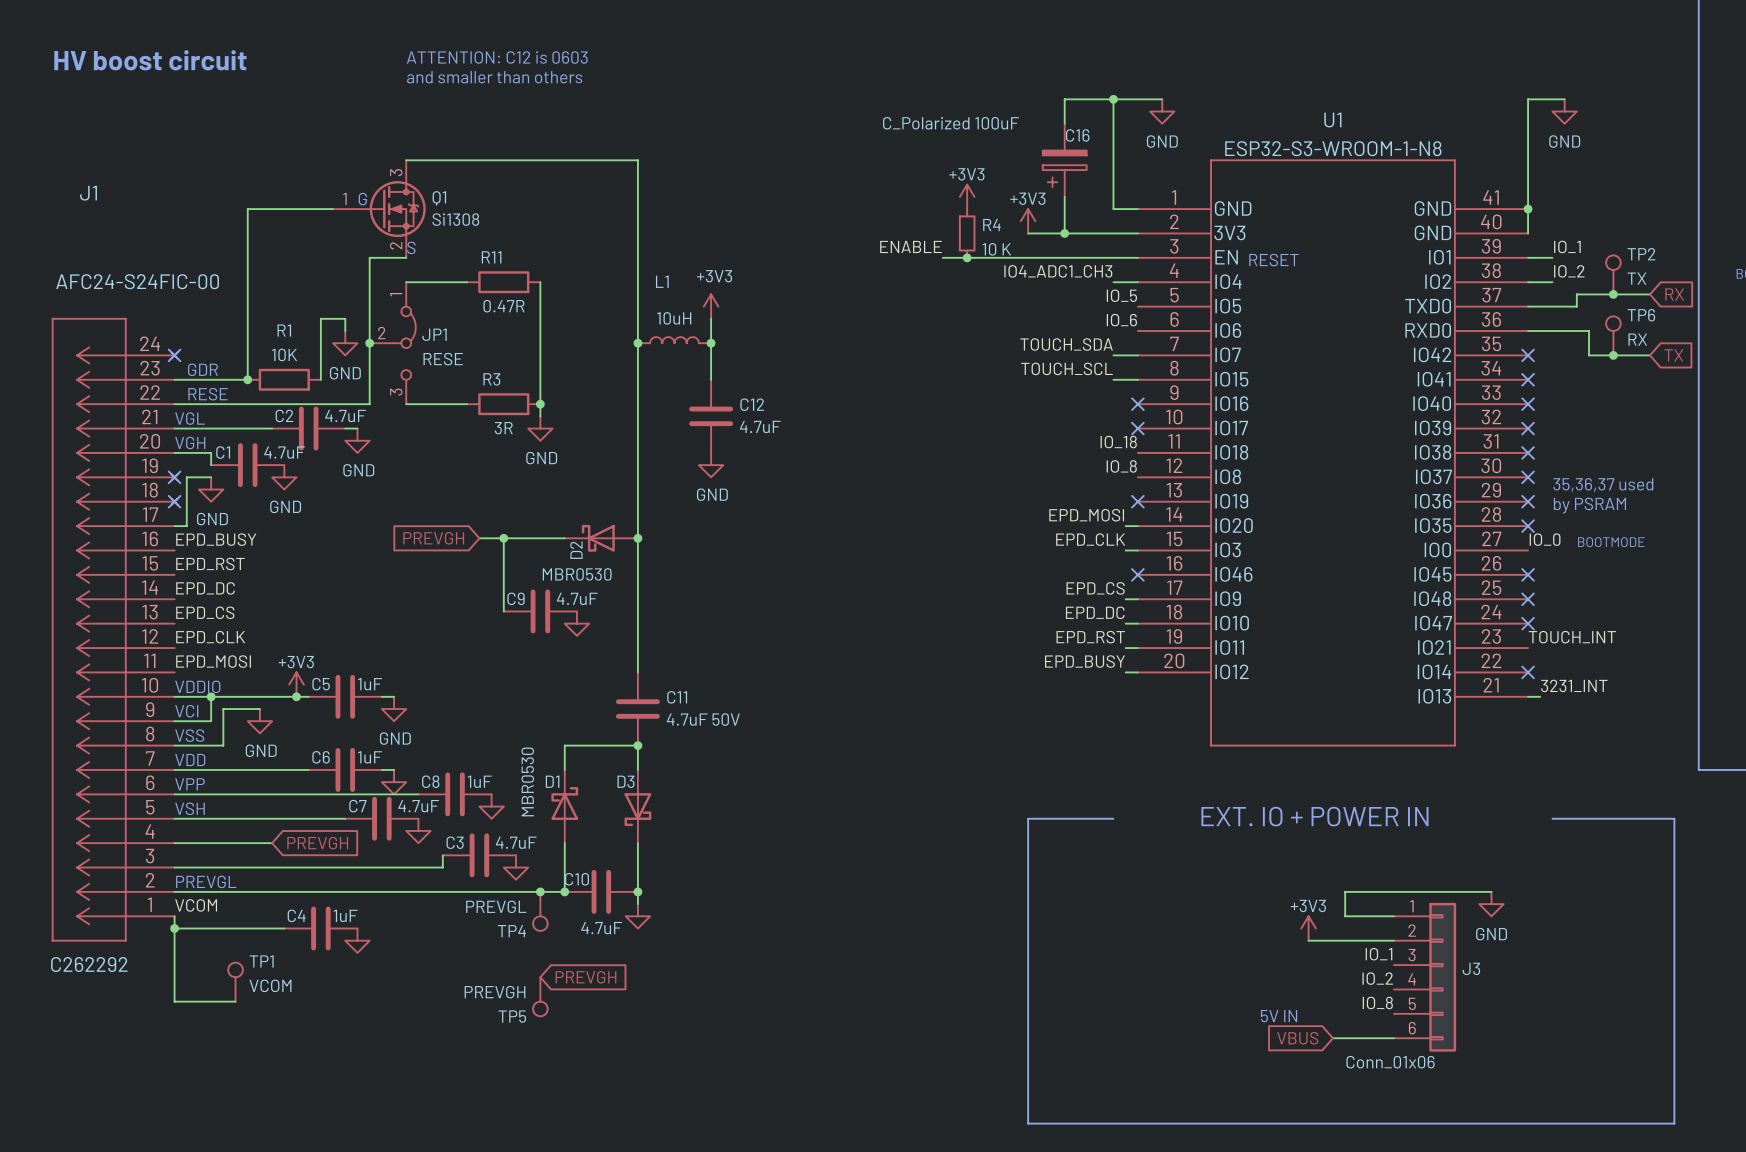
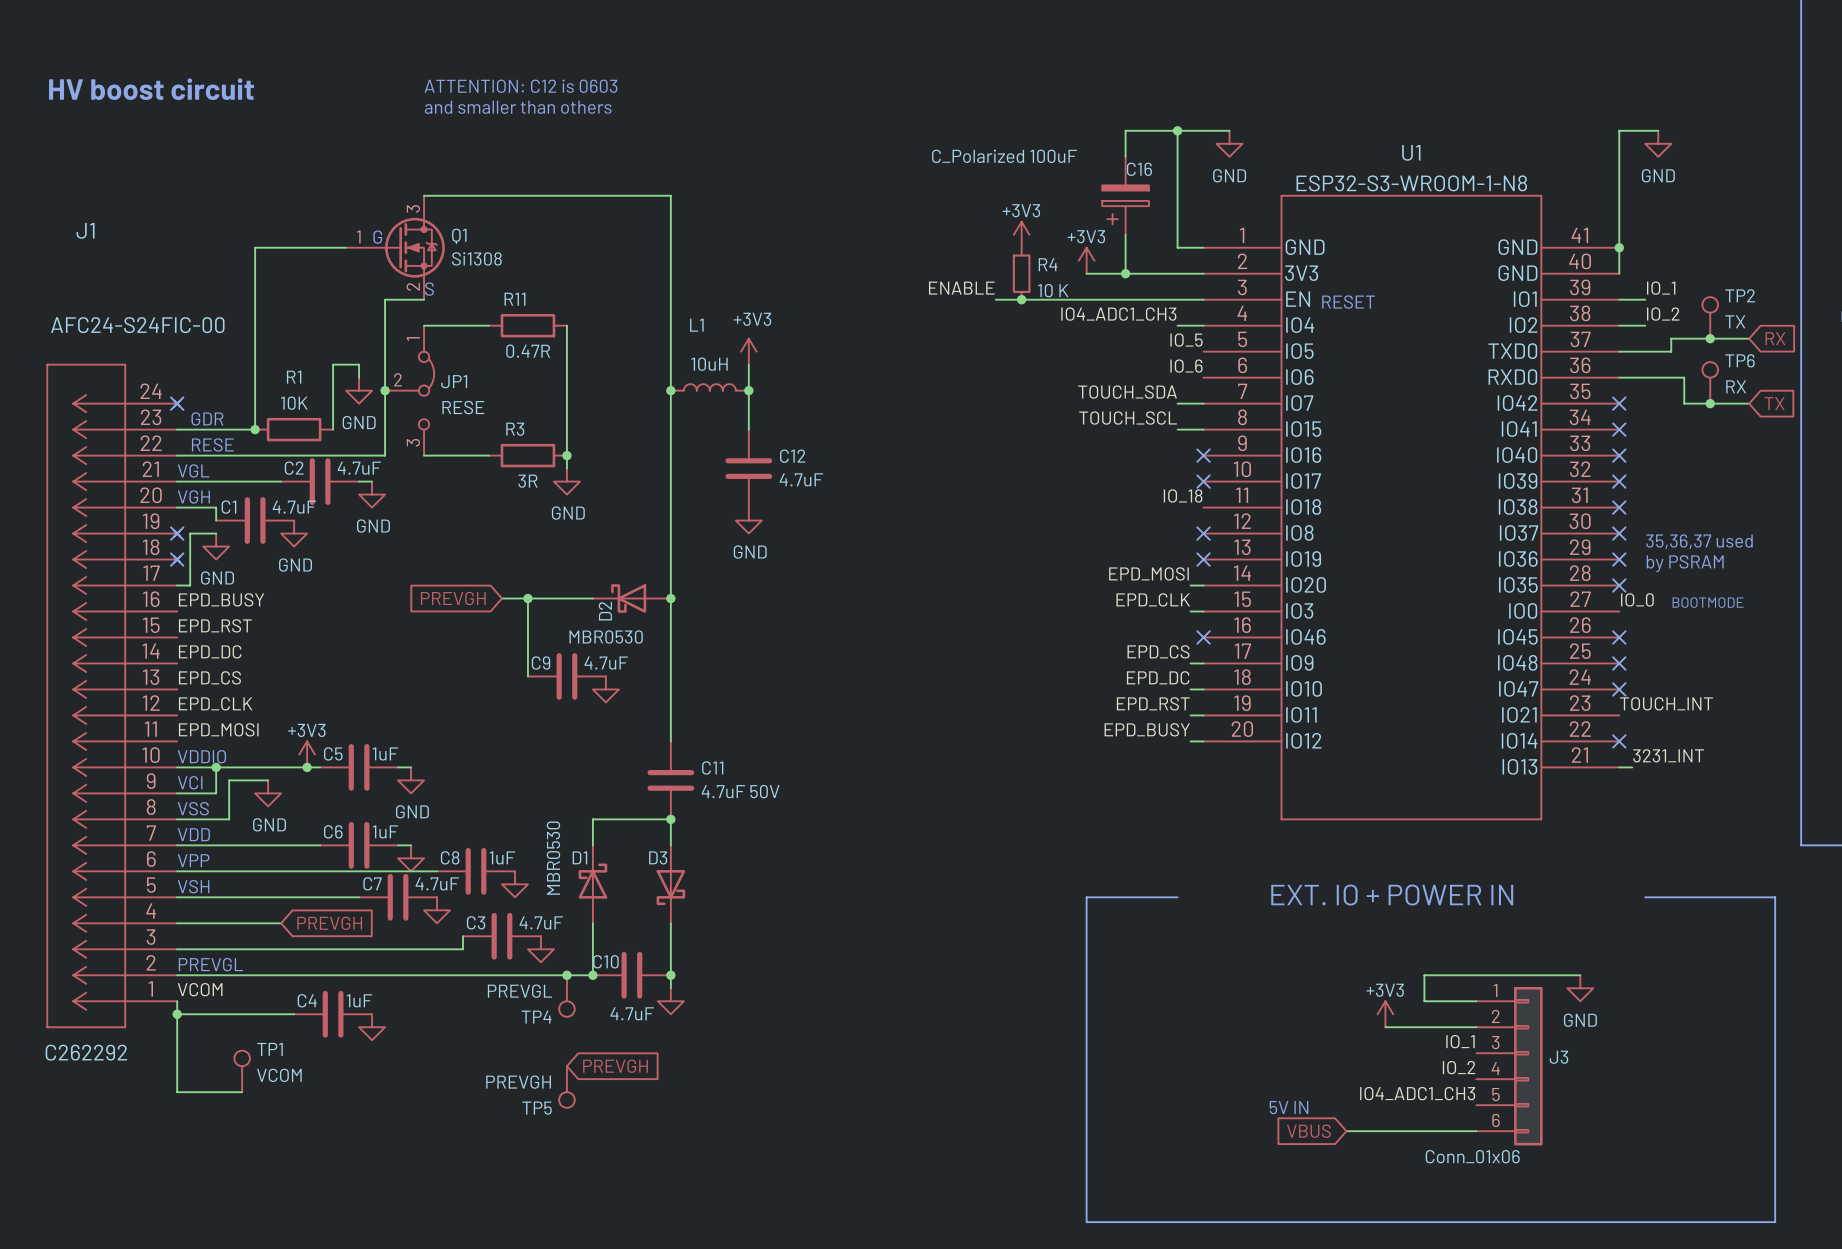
label: IO_8 (1121, 466) -> none
no-connect mark: none -> (1203, 533)
label: IO_8 (1377, 1002) -> IO4_ADC1_CH3 (1417, 1093)
text position: 5V IN (1279, 1016) -> 5V IN (1289, 1107)
wire: none -> (1346, 1131) (1411, 1131)
global label position: VBUS (1297, 1038) -> VBUS (1308, 1131)

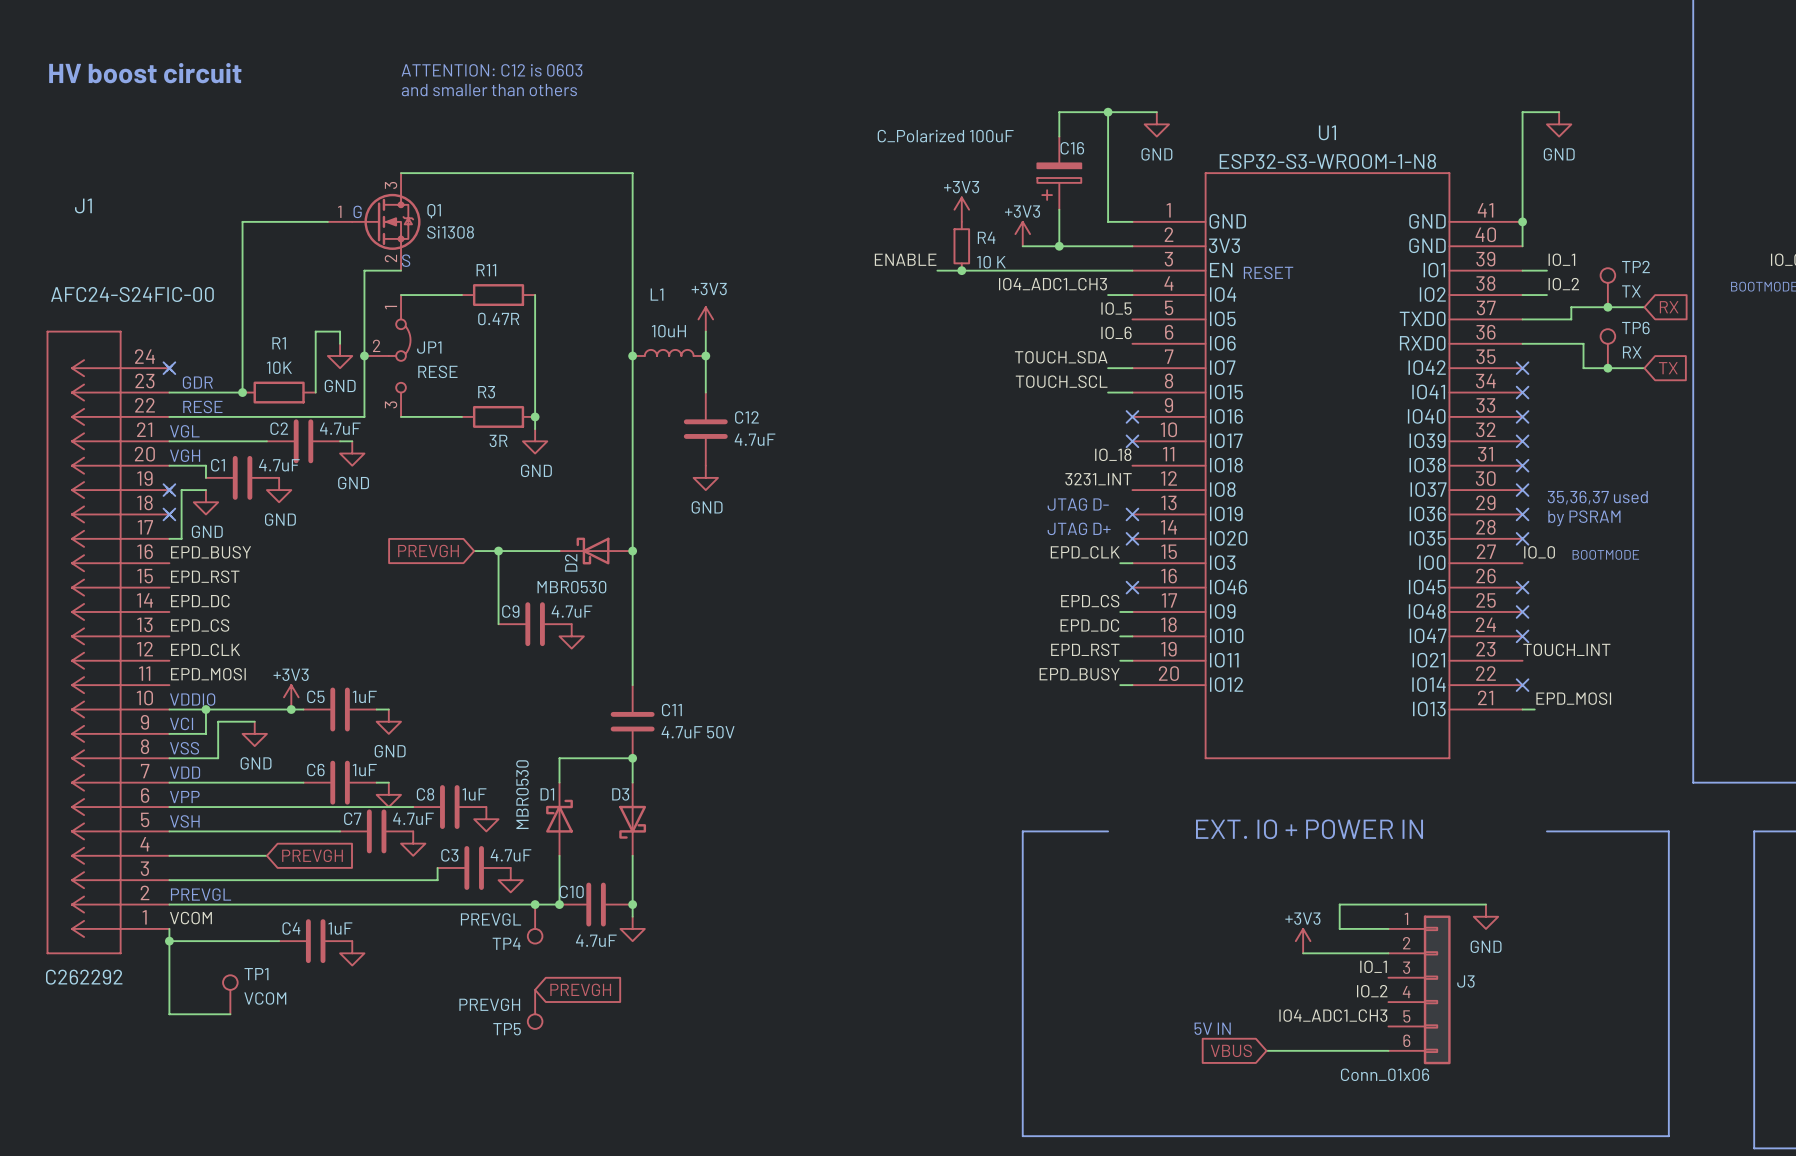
label: none -> 3231_INT (1098, 479)
no-connect mark position: (1203, 533) -> (1132, 538)
text: none -> JTAG D- (1078, 504)
label: EPD_MOSI (1148, 573) -> none
text: none -> JTAG D+ (1079, 528)
wire: (1190, 585) (1203, 585) -> none
label: 3231_INT (1668, 755) -> EPD_MOSI (1573, 698)

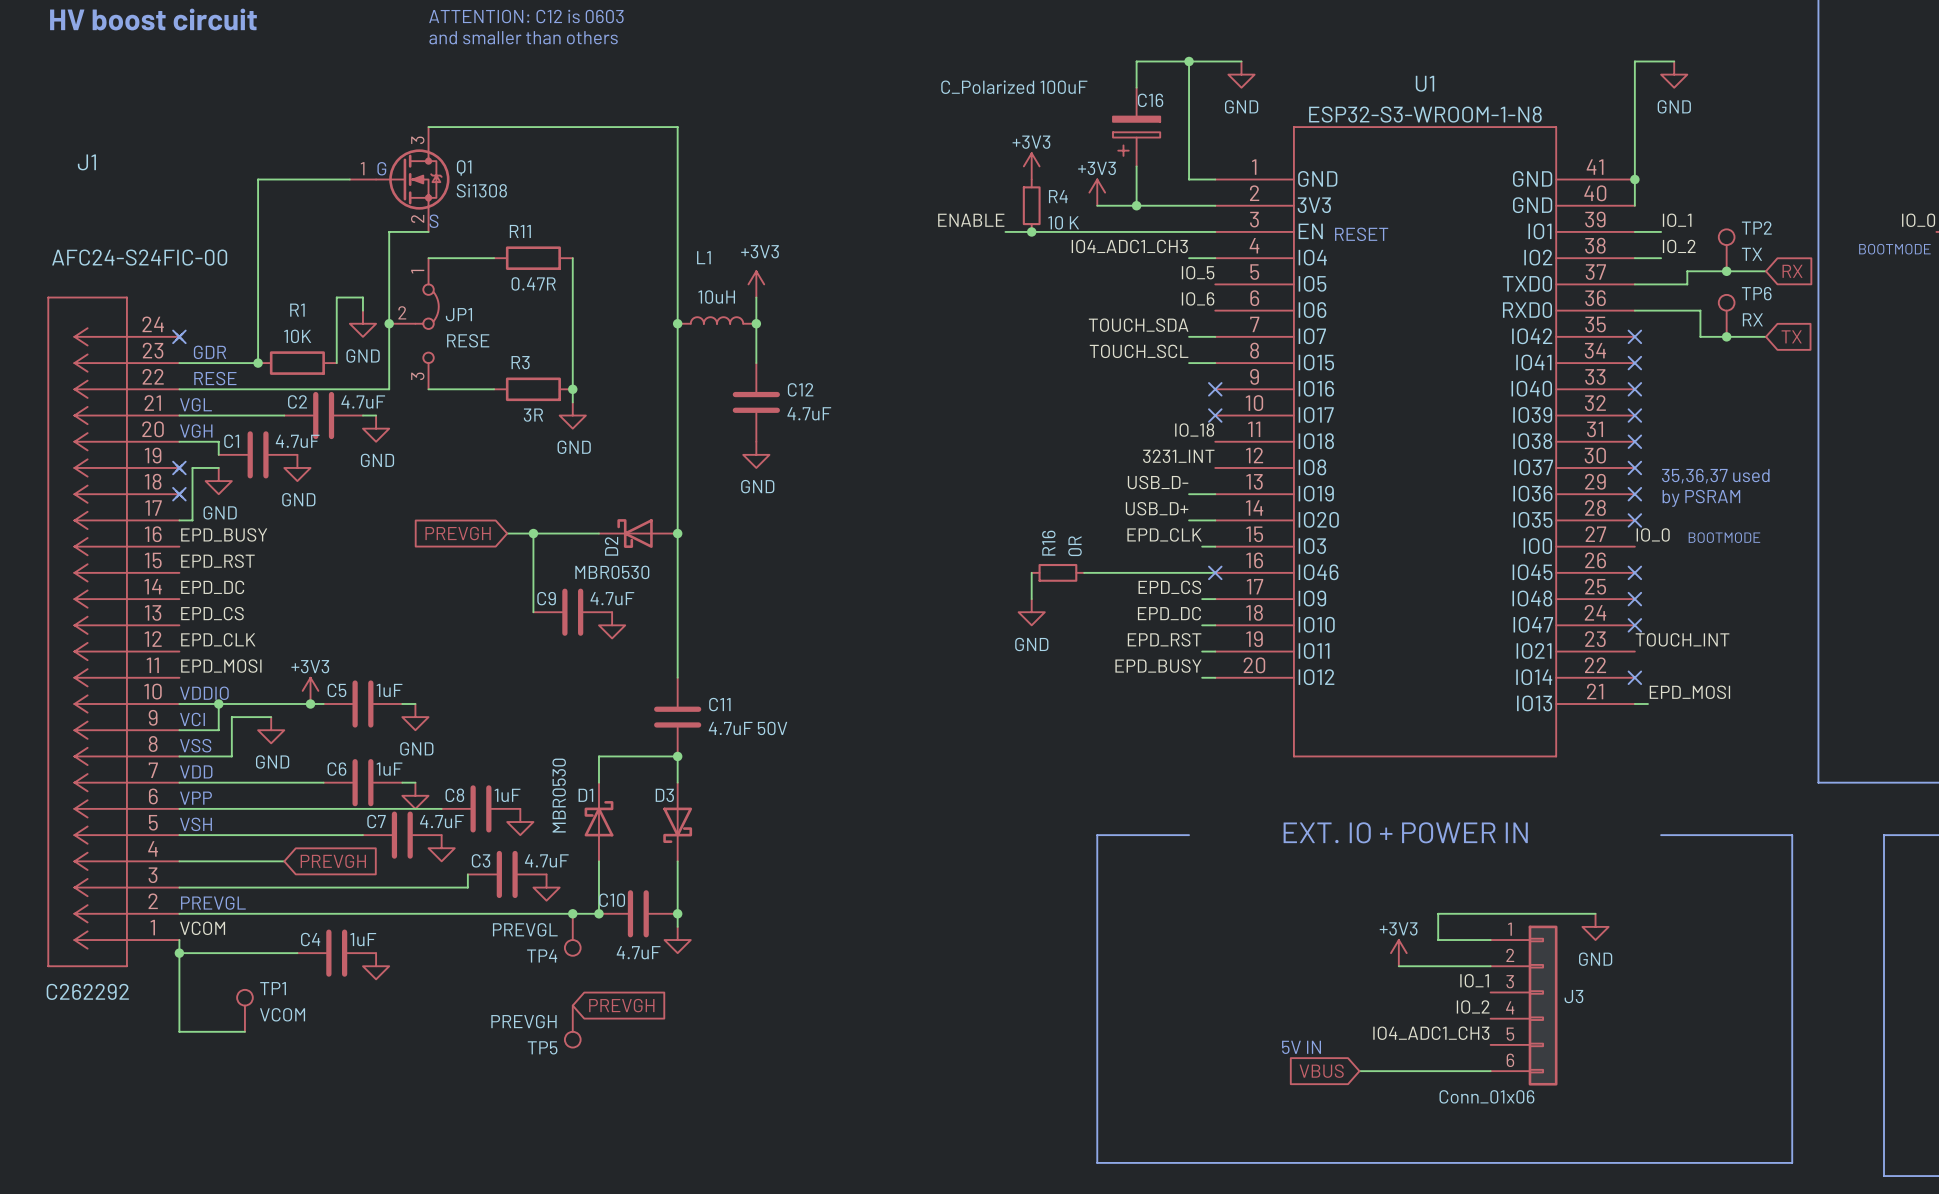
label: none -> USB_D- (1158, 482)
text: JTAG D- (1078, 504) -> none
wire: none -> (1189, 494) (1215, 494)
no-connect mark: (1132, 514) -> none
label: none -> USB_D+ (1157, 508)
text: JTAG D+ (1079, 528) -> none
wire: none -> (1189, 520) (1215, 520)
no-connect mark: (1132, 538) -> none
wire: none -> (1031, 572) (1031, 599)
R16: none -> 0R (1057, 572)
wire: none -> (1084, 572) (1215, 572)
power symbol: none -> GND (1031, 612)

